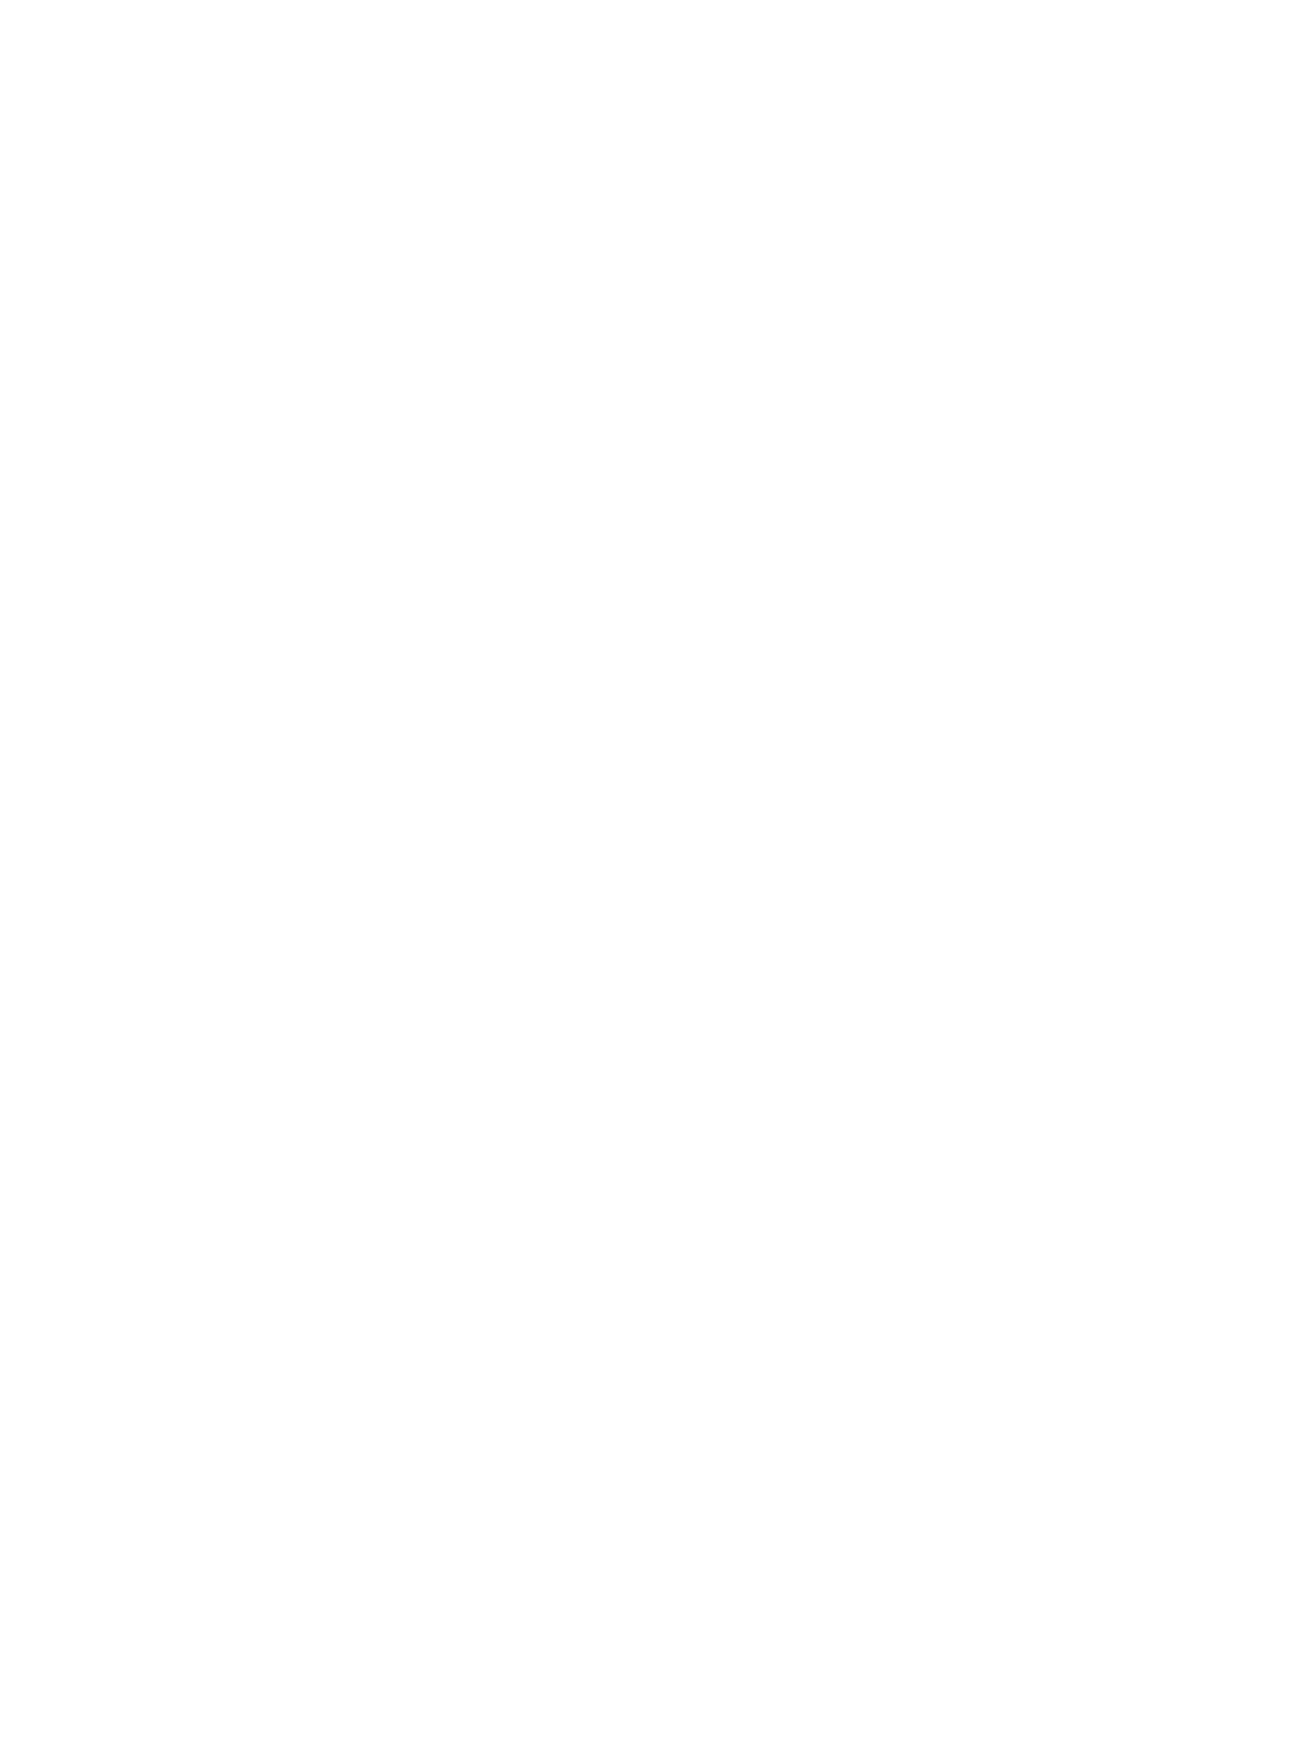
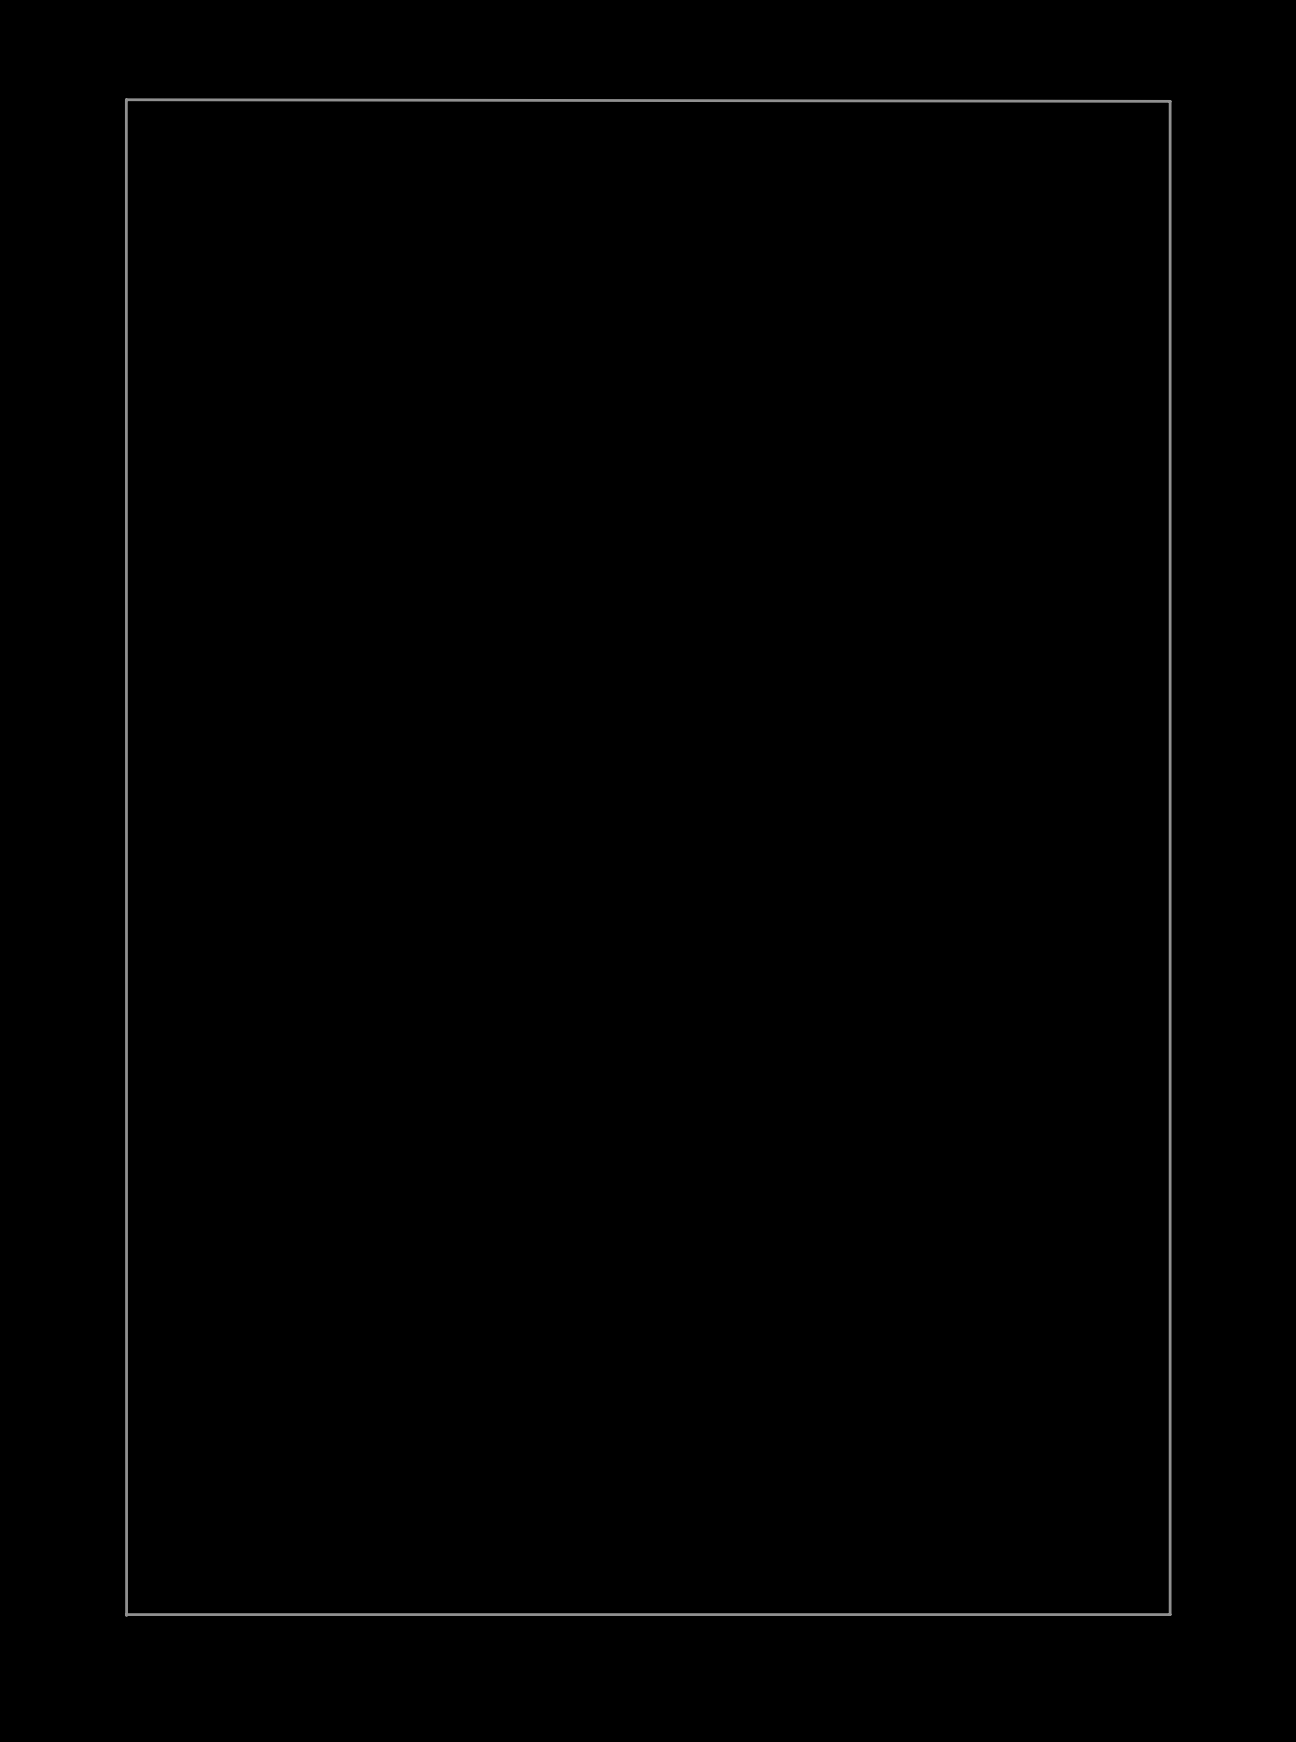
line: none -> (126, 1614) (1170, 1614) (1170, 101) (126, 99) (126, 1615)

